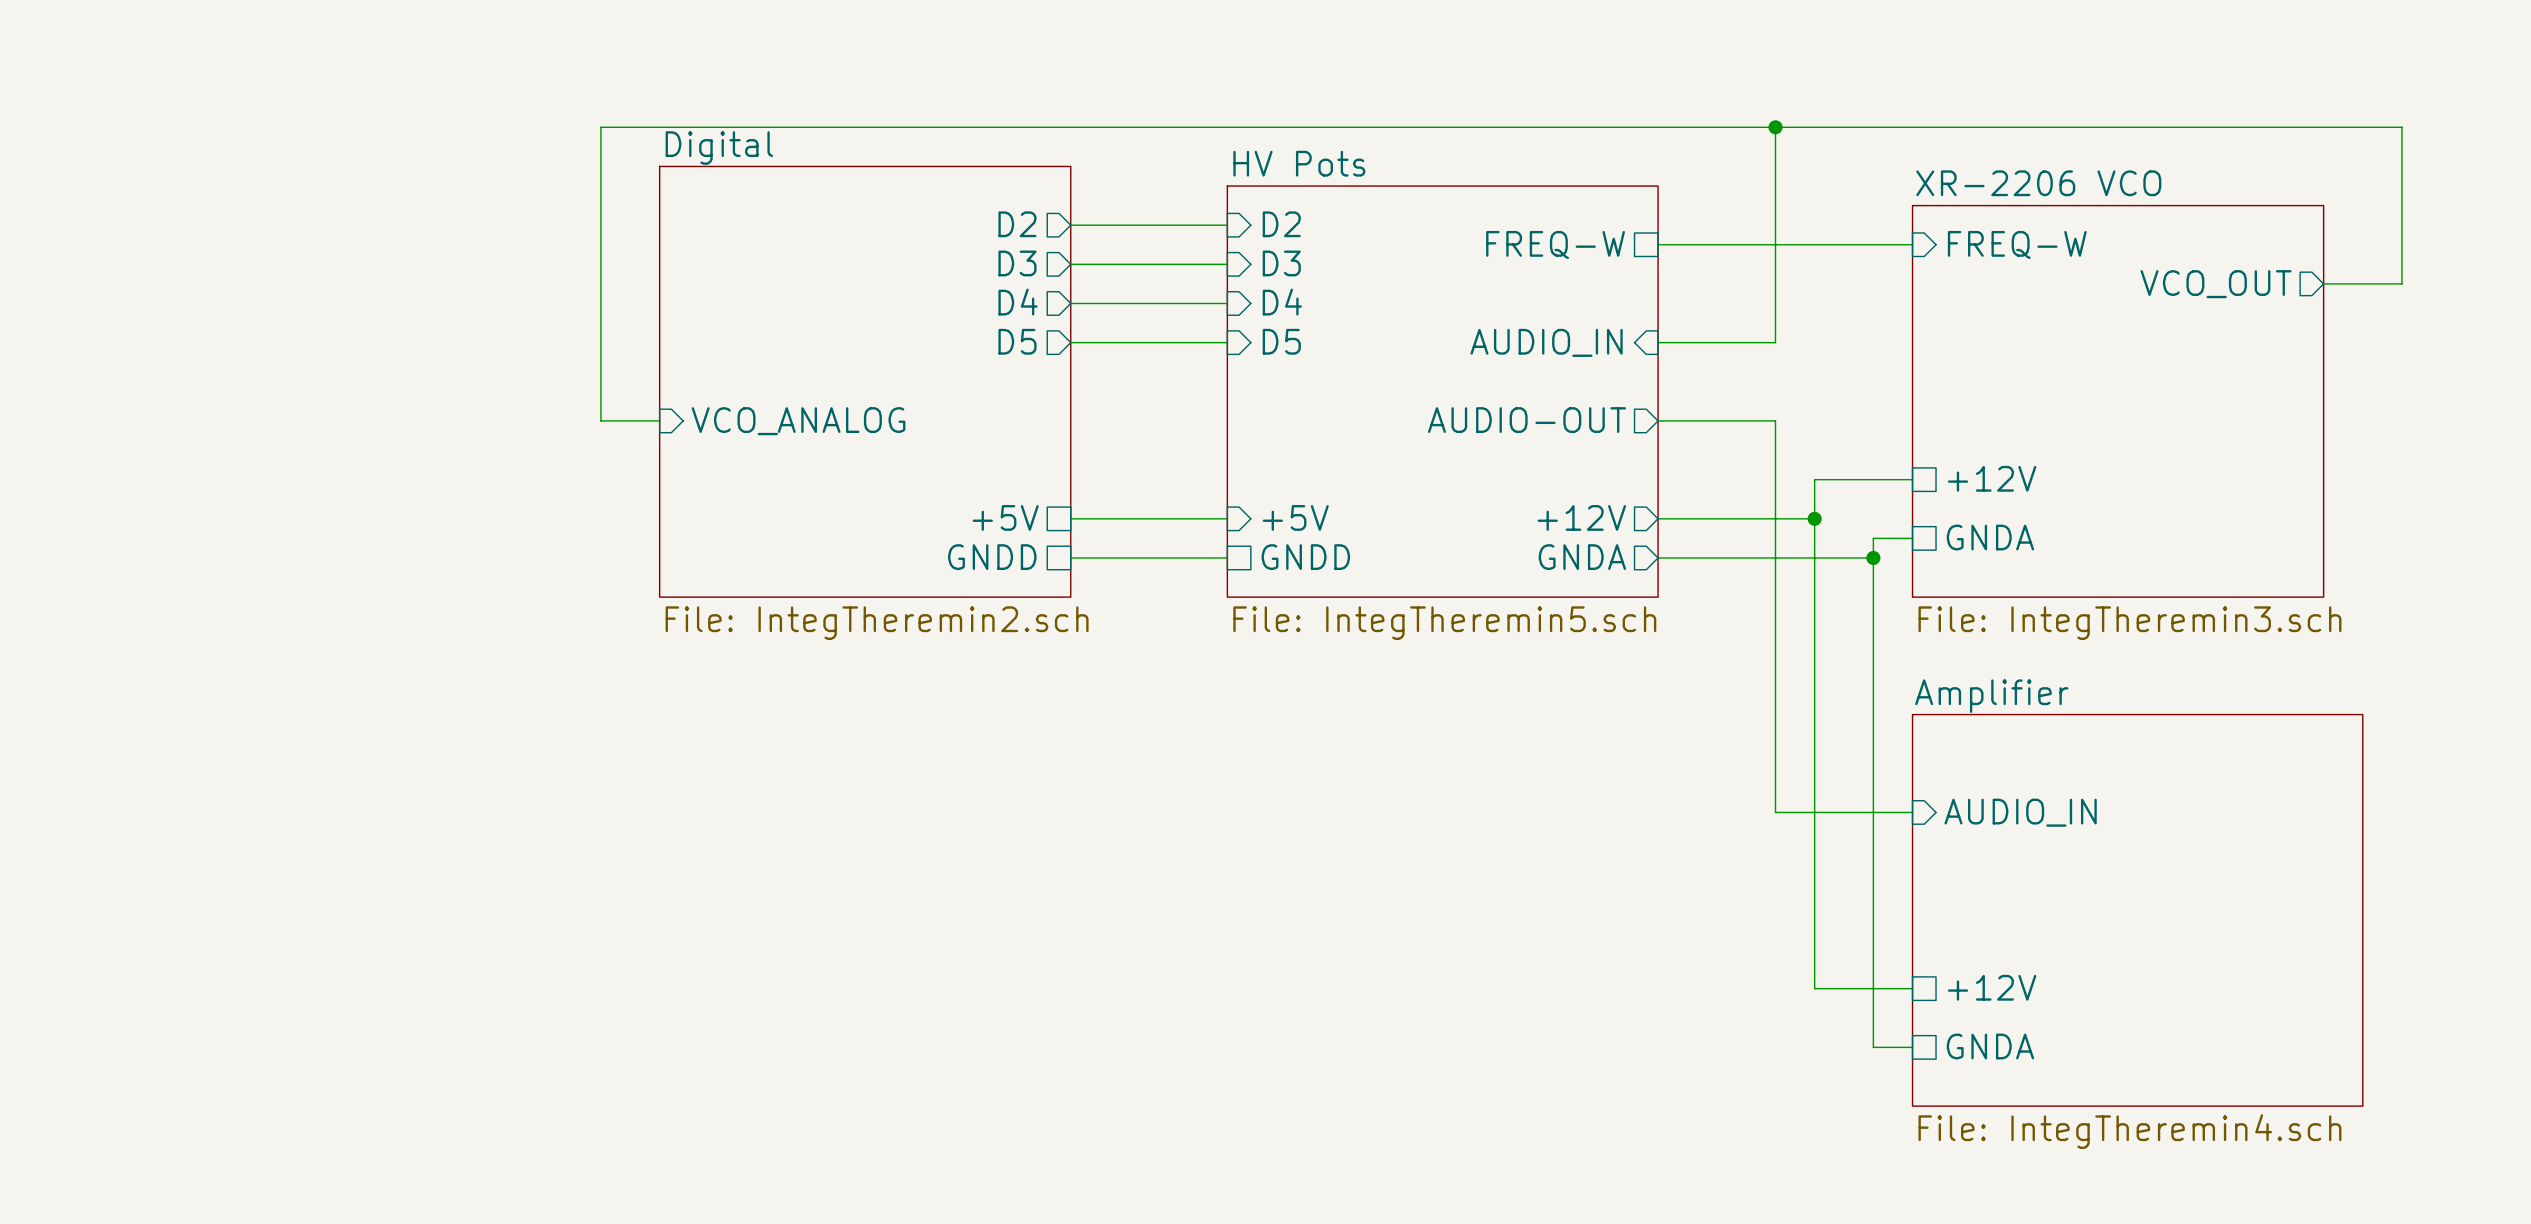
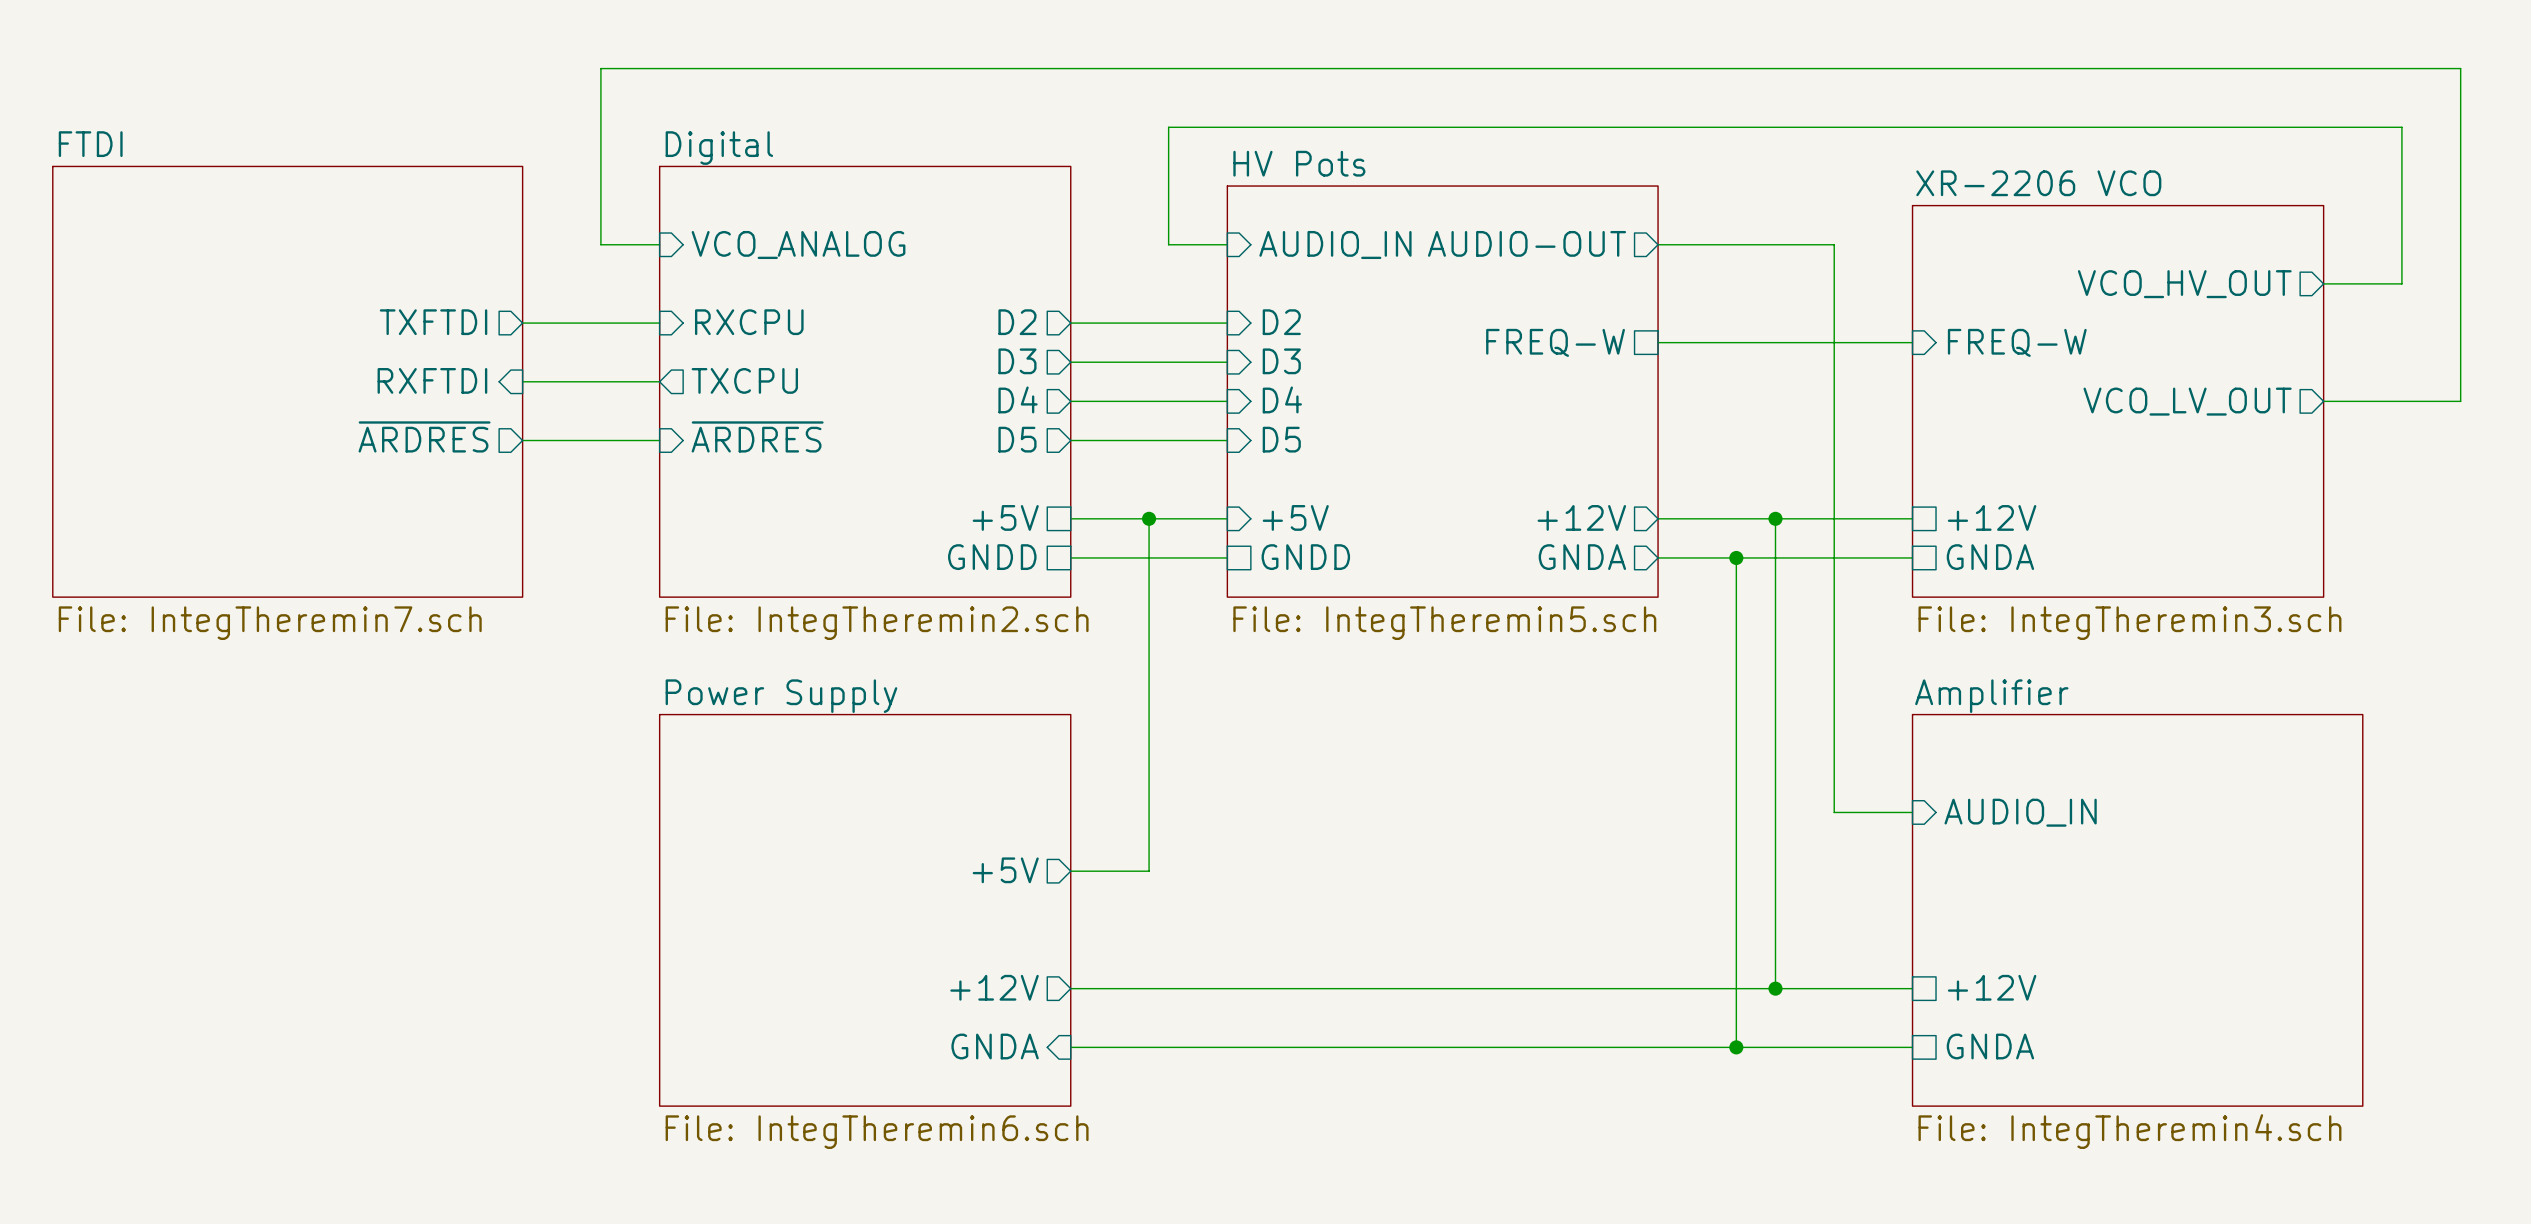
wire: (600, 127) (1168, 127) -> (1227, 244) (1168, 244) (1168, 127)
wire: none -> (600, 127) (600, 68) (2460, 68) (2460, 401) (2323, 401)
wire: (1775, 127) (1775, 342) -> (1912, 342) (1775, 342)
junction: (1775, 127) -> none
sheet pin position: D2 (1017, 224) -> D2 (1017, 322)
sheet pin position: D2 (1281, 224) -> D2 (1281, 322)
wire: (1070, 225) (1227, 225) -> (1070, 323) (1227, 323)
wire: (600, 244) (600, 420) (659, 420) -> (600, 244) (659, 244)
wire: (1834, 244) (1912, 244) -> (1834, 244) (1834, 812)
sheet pin: none -> AUDIO_IN (1335, 245)
sheet pin shape: passive (1555, 245) -> output (1527, 243)
sheet pin: FREQ-W (1555, 245) -> AUDIO-OUT (1527, 243)
sheet pin position: FREQ-W (2017, 245) -> FREQ-W (2017, 342)
sheet pin position: D3 (1017, 263) -> D3 (1017, 361)
sheet pin position: D3 (1281, 263) -> D3 (1281, 361)
wire: (1070, 264) (1227, 264) -> (1070, 362) (1227, 362)
sheet pin: VCO_OUT (2216, 284) -> VCO_HV_OUT (2184, 284)
sheet pin position: D4 (1018, 302) -> D4 (1018, 399)
sheet pin position: D4 (1282, 302) -> D4 (1282, 399)
wire: (1070, 303) (1227, 303) -> (1070, 401) (1227, 401)
sheet pin: none -> TXFTDI (433, 322)
sheet pin: none -> RXCPU (749, 322)
wire: none -> (522, 323) (659, 323)
sheet pin position: D5 (1017, 341) -> D5 (1017, 439)
sheet pin position: D5 (1281, 341) -> D5 (1281, 439)
wire: (1070, 342) (1227, 342) -> (1070, 440) (1227, 440)
sheet pin shape: input (1546, 342) -> passive (1555, 342)
sheet pin: AUDIO_IN (1546, 342) -> FREQ-W (1555, 342)
sheet pin: none -> RXFTDI (432, 380)
sheet pin: none -> TXCPU (744, 380)
sheet FTDI: none -> File: IntegTheremin7.sch (287, 381)
wire: none -> (522, 381) (659, 381)
sheet pin: none -> VCO_LV_OUT (2187, 401)
sheet pin: AUDIO-OUT (1527, 420) -> none
wire: (1658, 420) (1775, 420) (1775, 518) -> none
sheet pin position: VCO_ANALOG (798, 421) -> VCO_ANALOG (798, 245)
sheet pin: none -> ~{ARDRES} (424, 436)
sheet pin: none -> ~{ARDRES} (757, 436)
wire: none -> (522, 440) (659, 440)
sheet pin position: +12V (1992, 478) -> +12V (1992, 517)
wire: (1912, 479) (1814, 479) (1814, 988) -> (1070, 988) (1814, 988)
wire: none -> (1149, 518) (1149, 871) (1070, 871)
junction: none -> (1149, 518)
wire: none -> (1814, 518) (1912, 518)
junction position: (1814, 518) -> (1775, 518)
sheet pin position: GNDA (1990, 537) -> GNDA (1990, 557)
wire: (1912, 538) (1873, 538) (1873, 1047) -> (1070, 1047) (1873, 1047)
wire: none -> (1736, 557) (1736, 1047)
junction: none -> (1736, 557)
wire: none -> (1873, 557) (1912, 557)
junction: (1873, 557) -> none
wire: (1775, 812) (1834, 812) -> (1775, 812) (1775, 988)
sheet pin: none -> +5V (1005, 870)
sheet Power Supply: none -> File: IntegTheremin6.sch (865, 910)
sheet pin: none -> +12V (994, 987)
junction: none -> (1775, 988)
sheet pin: none -> GNDA (995, 1046)
junction: none -> (1736, 1047)

